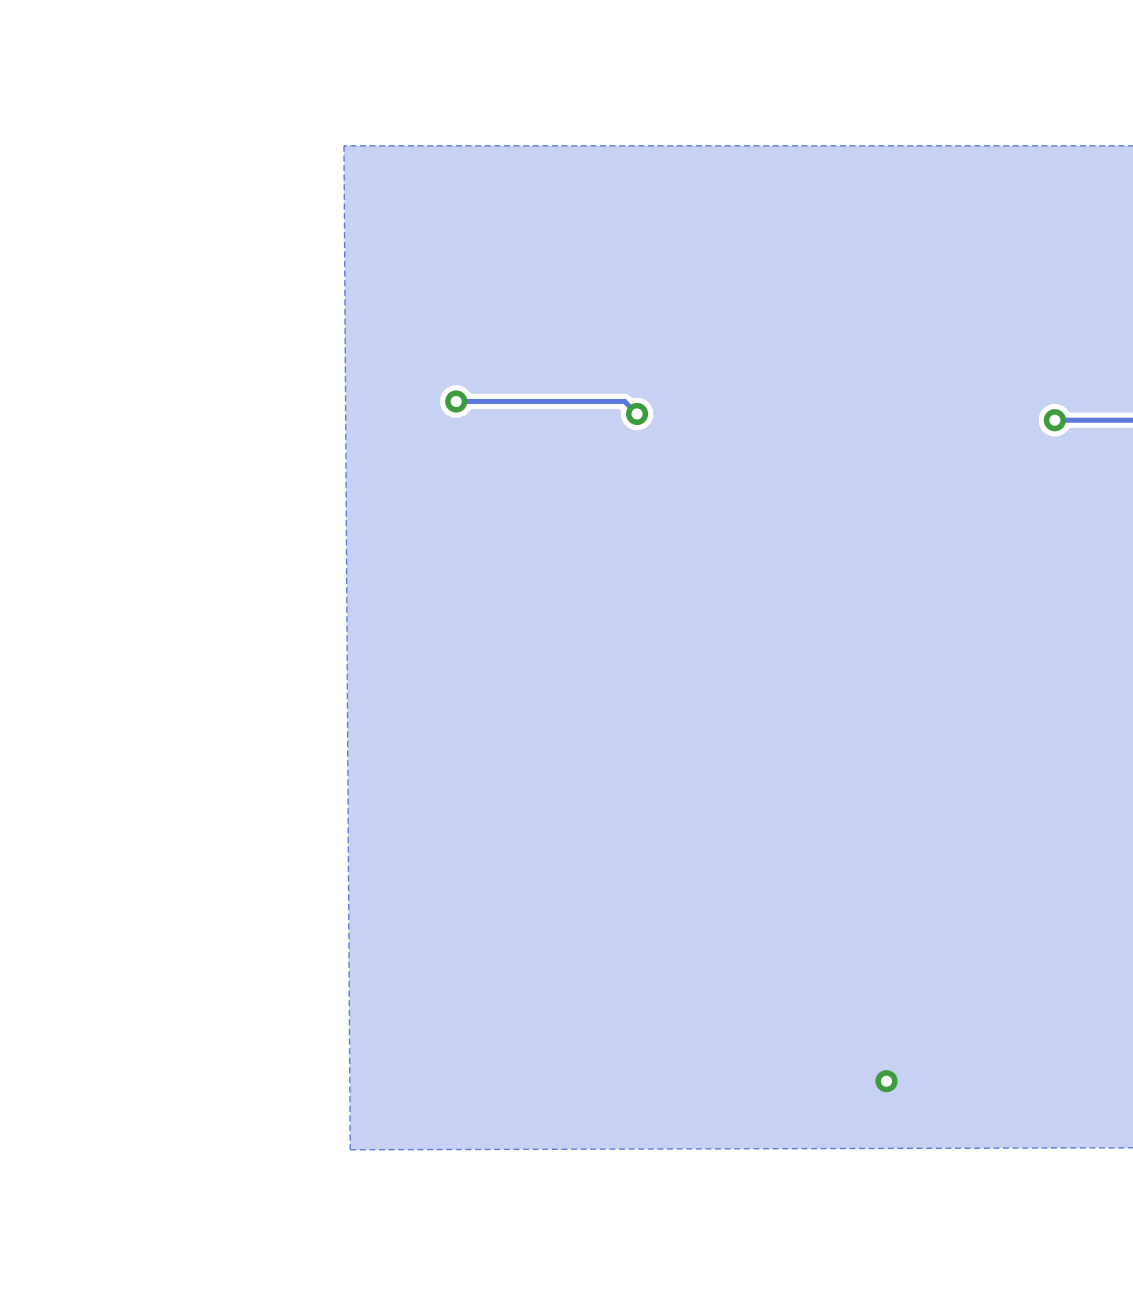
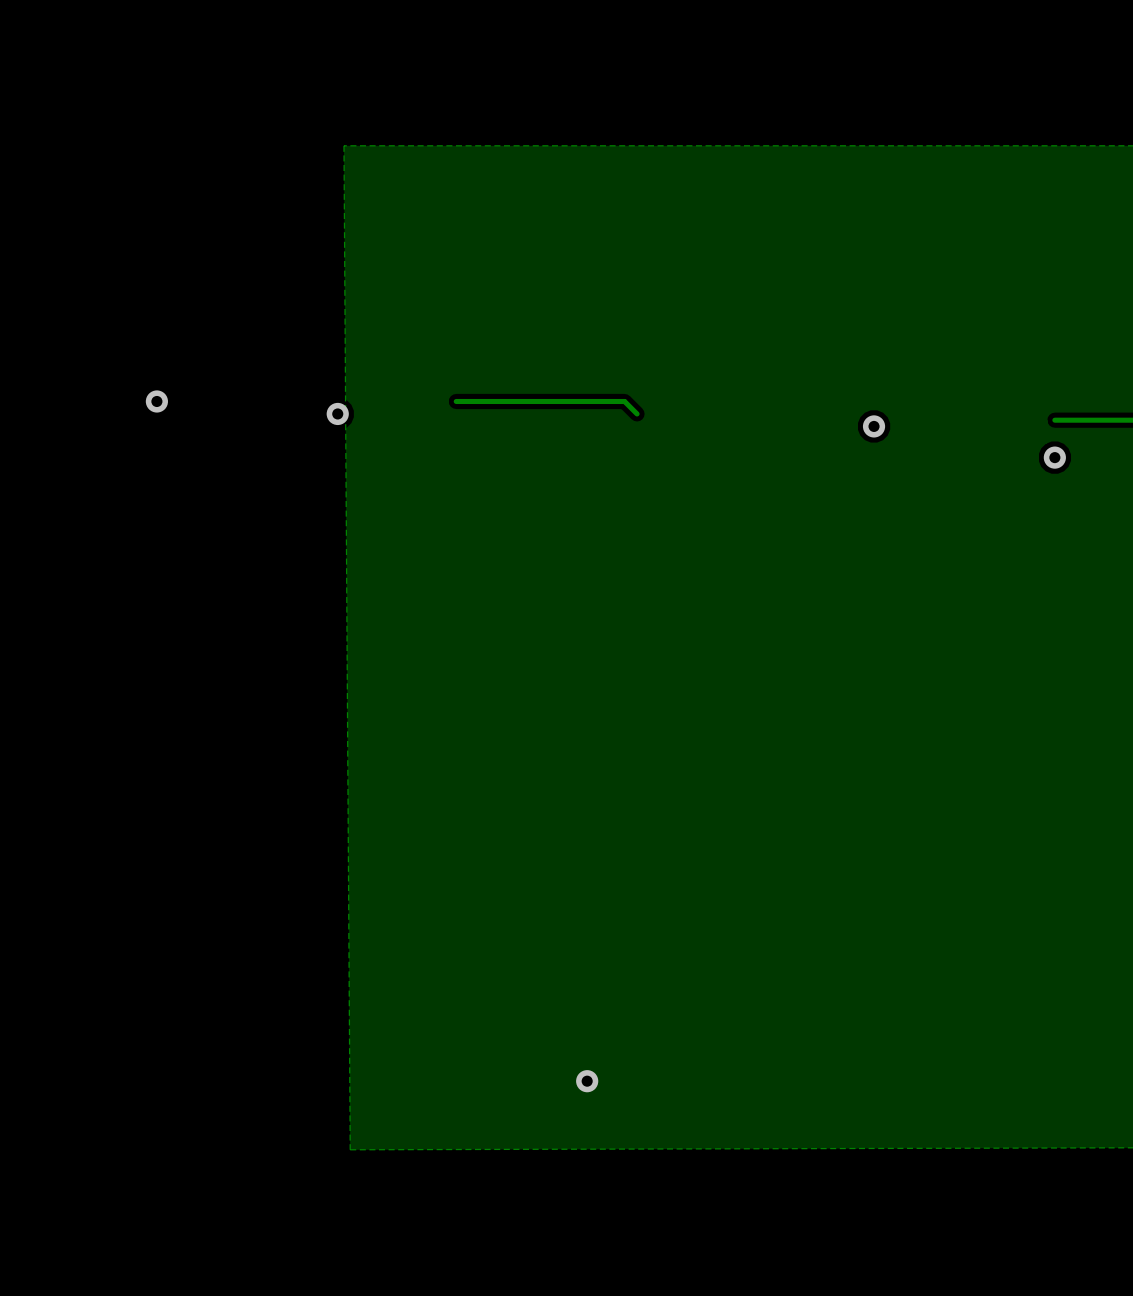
via: none -> (156, 401)
via position: (456, 401) -> (337, 413)
via: (637, 413) -> none
via position: (1054, 420) -> (1054, 457)
via: none -> (874, 426)
via: none -> (587, 1081)
via: (886, 1081) -> none

